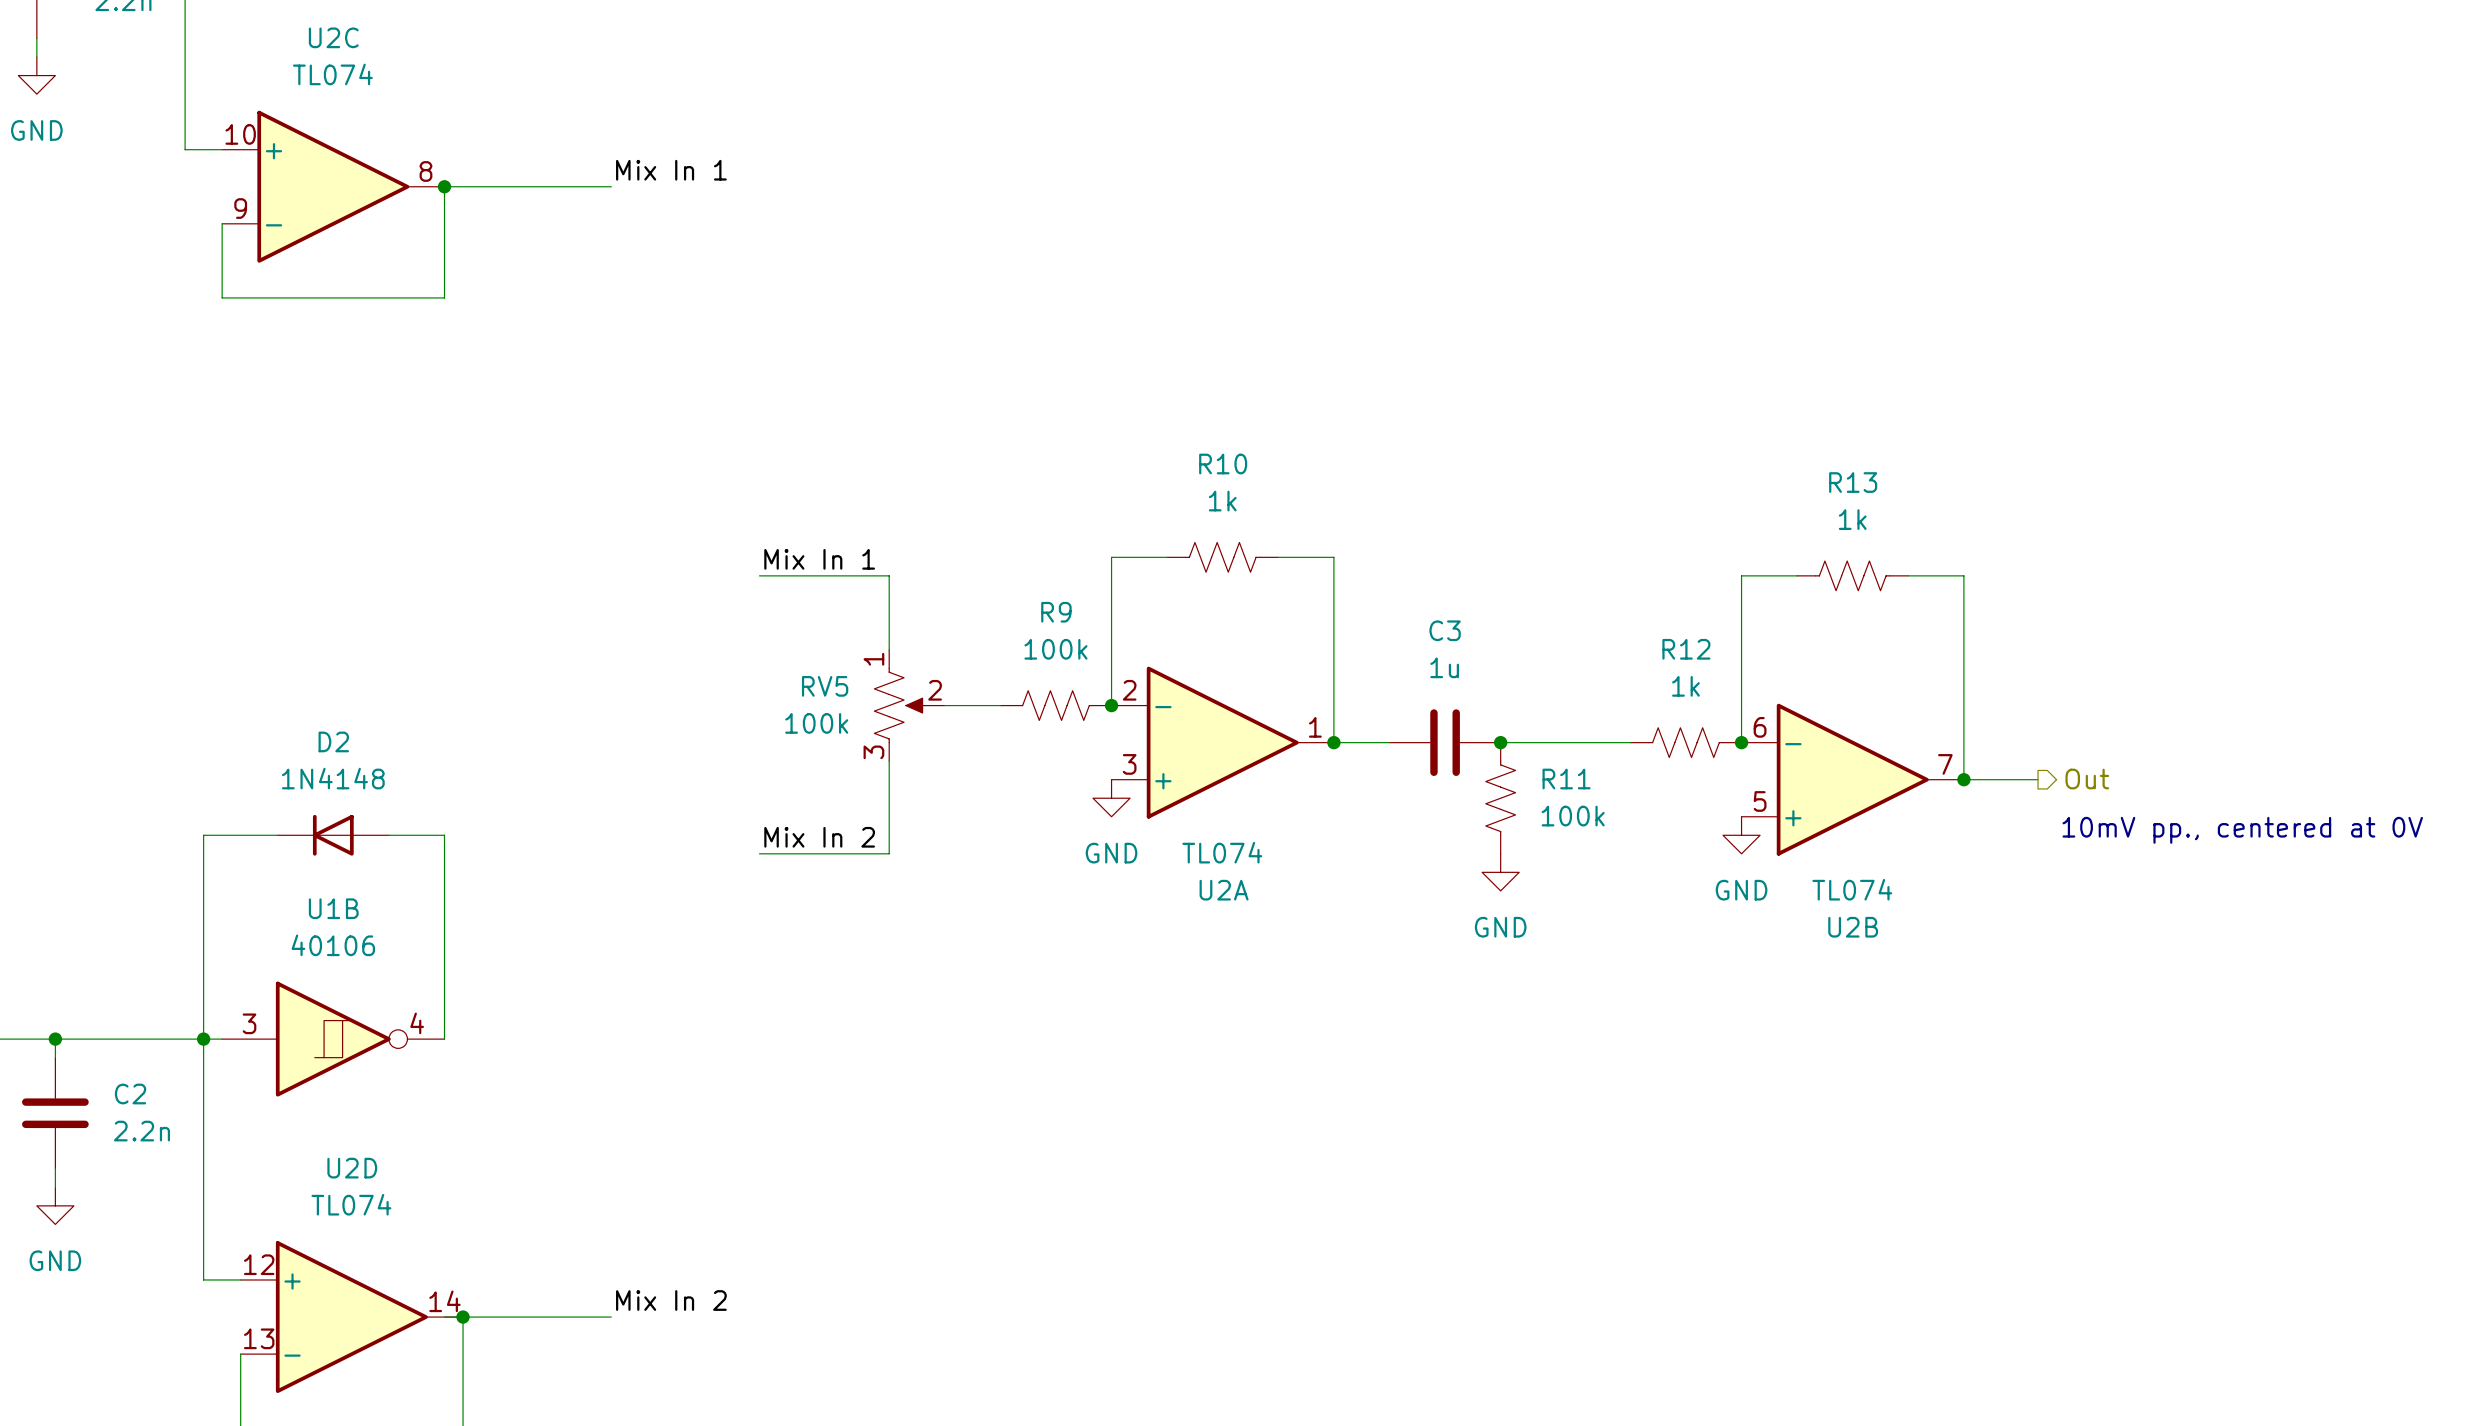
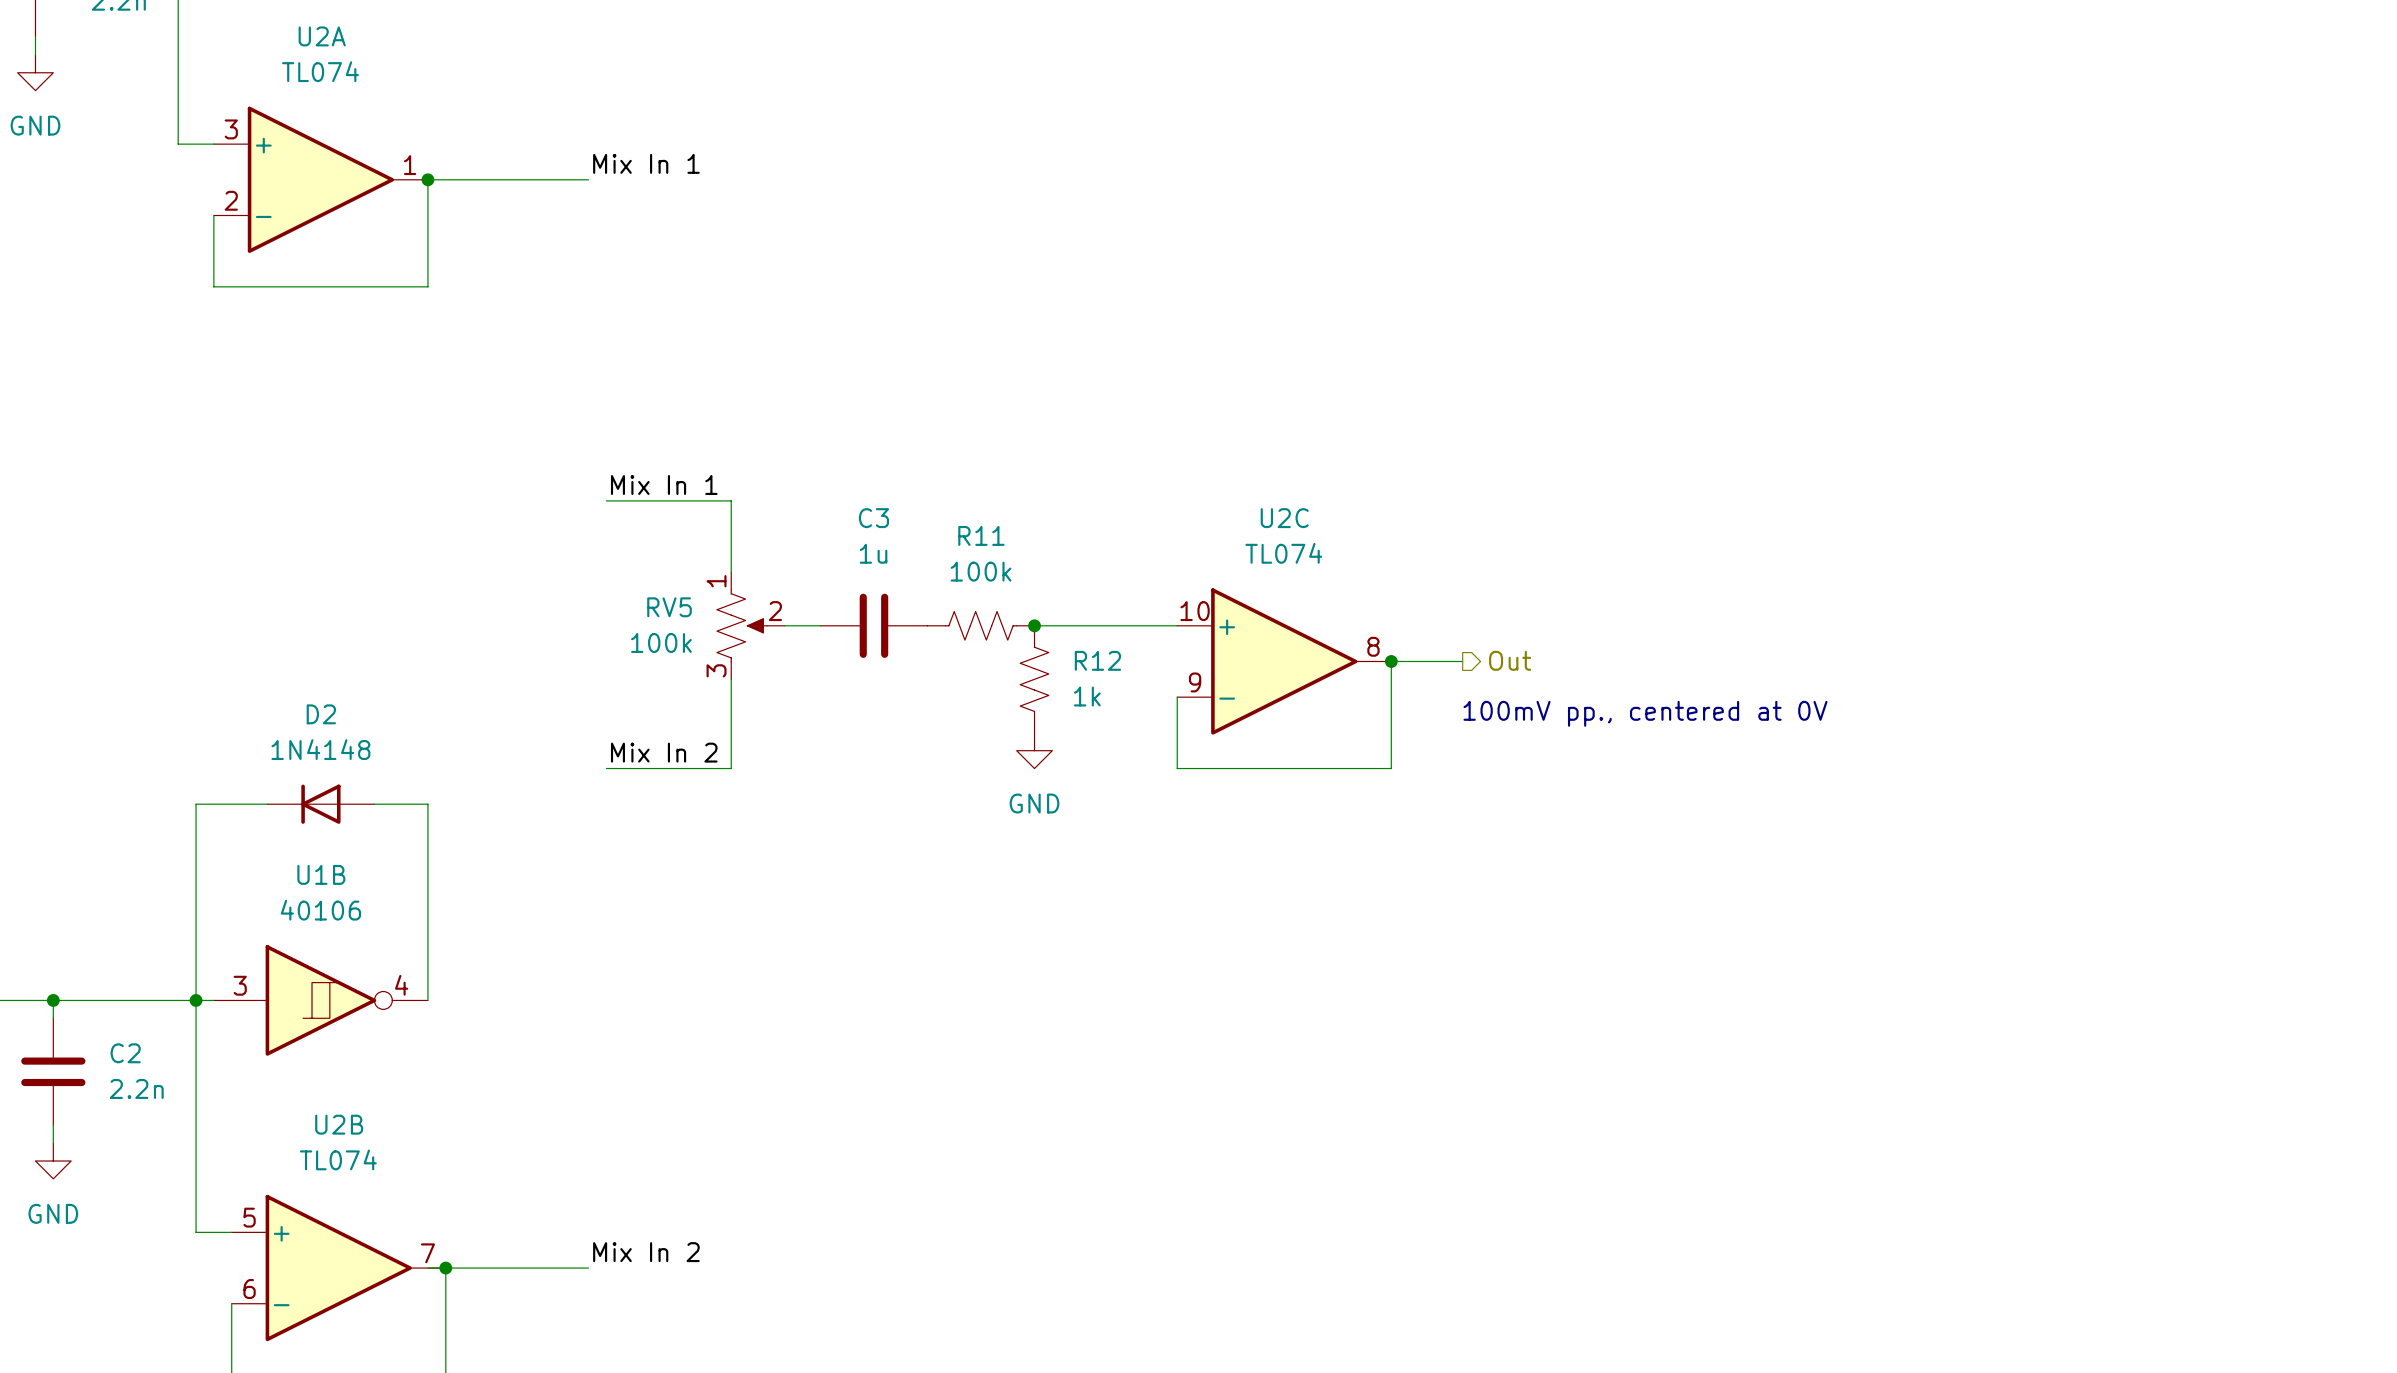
U2C position: (333, 186) -> (1284, 661)
wire: (1167, 557) (1111, 557) (1111, 705) -> none
R10: 1k (1222, 557) -> none
wire: (1278, 557) (1333, 557) (1333, 742) (1389, 742) -> none
label position: Mix In 1 (819, 559) -> Mix In 1 (664, 485)
wire: (759, 575) (889, 575) (889, 649) -> (606, 500) (731, 500) (731, 572)
wire: (1797, 575) (1741, 575) (1741, 742) -> none
R13: 1k (1852, 575) -> none
wire: (1908, 575) (1963, 575) (1963, 779) (2038, 779) -> none
wire: none -> (784, 625) (820, 625)
wire: none -> (1034, 625) (1177, 625)
R12 name position: R12 (1686, 649) -> R12 (1097, 660)
hierarchical label: none -> Out (1510, 660)
junction: none -> (1391, 661)
wire: none -> (1462, 661) (1391, 661) (1391, 768) (1177, 768) (1177, 697)
RV5 position: (909, 705) -> (750, 625)
wire: (944, 705) (1000, 705) -> none
R9: 100k (1055, 705) -> none
junction position: (1111, 705) -> (1034, 625)
text: none -> 100mV pp., centered at 0V (1645, 713)
U2A flip: as is (1222, 742) -> up-down (320, 179)
U2A position: (1222, 742) -> (320, 179)
junction: (1333, 742) -> none
C3 position: (1445, 742) -> (873, 625)
wire: (1500, 742) (1630, 742) -> none
junction: (1500, 742) -> none
R12 rotation: 0° (1685, 742) -> 90° clockwise (1034, 679)
R12 position: (1685, 742) -> (1034, 679)
junction: (1741, 742) -> none
wire: (889, 761) (889, 853) (759, 853) -> (731, 679) (731, 768) (606, 768)
R11 name position: R11 (1566, 779) -> R11 (981, 535)
U2B flip: as is (1852, 779) -> up-down (338, 1268)
U2B position: (1852, 779) -> (338, 1268)
junction: (1963, 779) -> none
hierarchical label: Out (2087, 779) -> none
power symbol position: GND (1111, 798) -> GND (1034, 750)
R11 rotation: 0° (1500, 798) -> 90° clockwise (981, 625)
R11 position: (1500, 798) -> (981, 625)
R11 value position: 100k (1573, 816) -> 100k (981, 571)
text: 10mV pp., centered at 0V (2242, 830) -> none
power symbol: GND (1741, 835) -> none
label position: Mix In 2 (819, 837) -> Mix In 2 (664, 752)
power symbol: GND (1500, 872) -> none
U2D: TL074 (351, 1317) -> none

